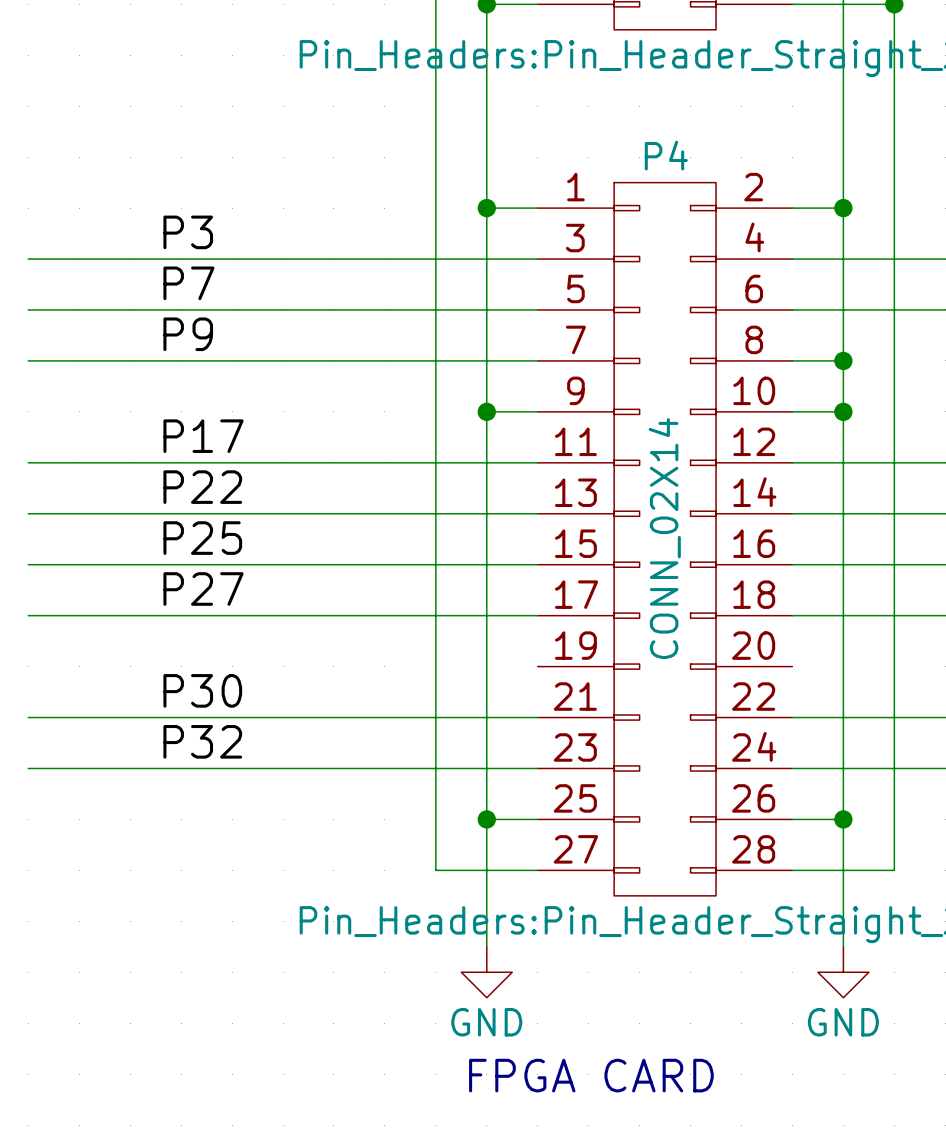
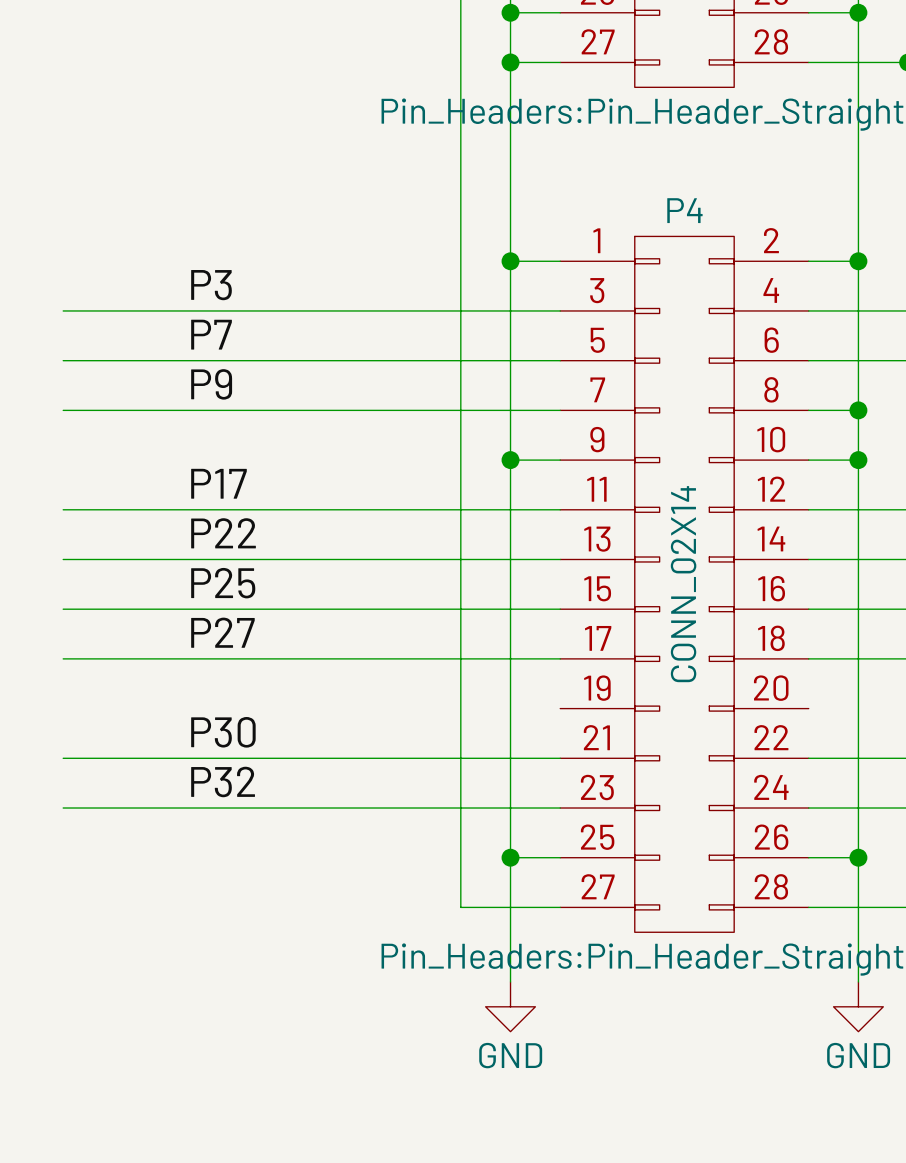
text: FPGA CARD (591, 1075) -> none

